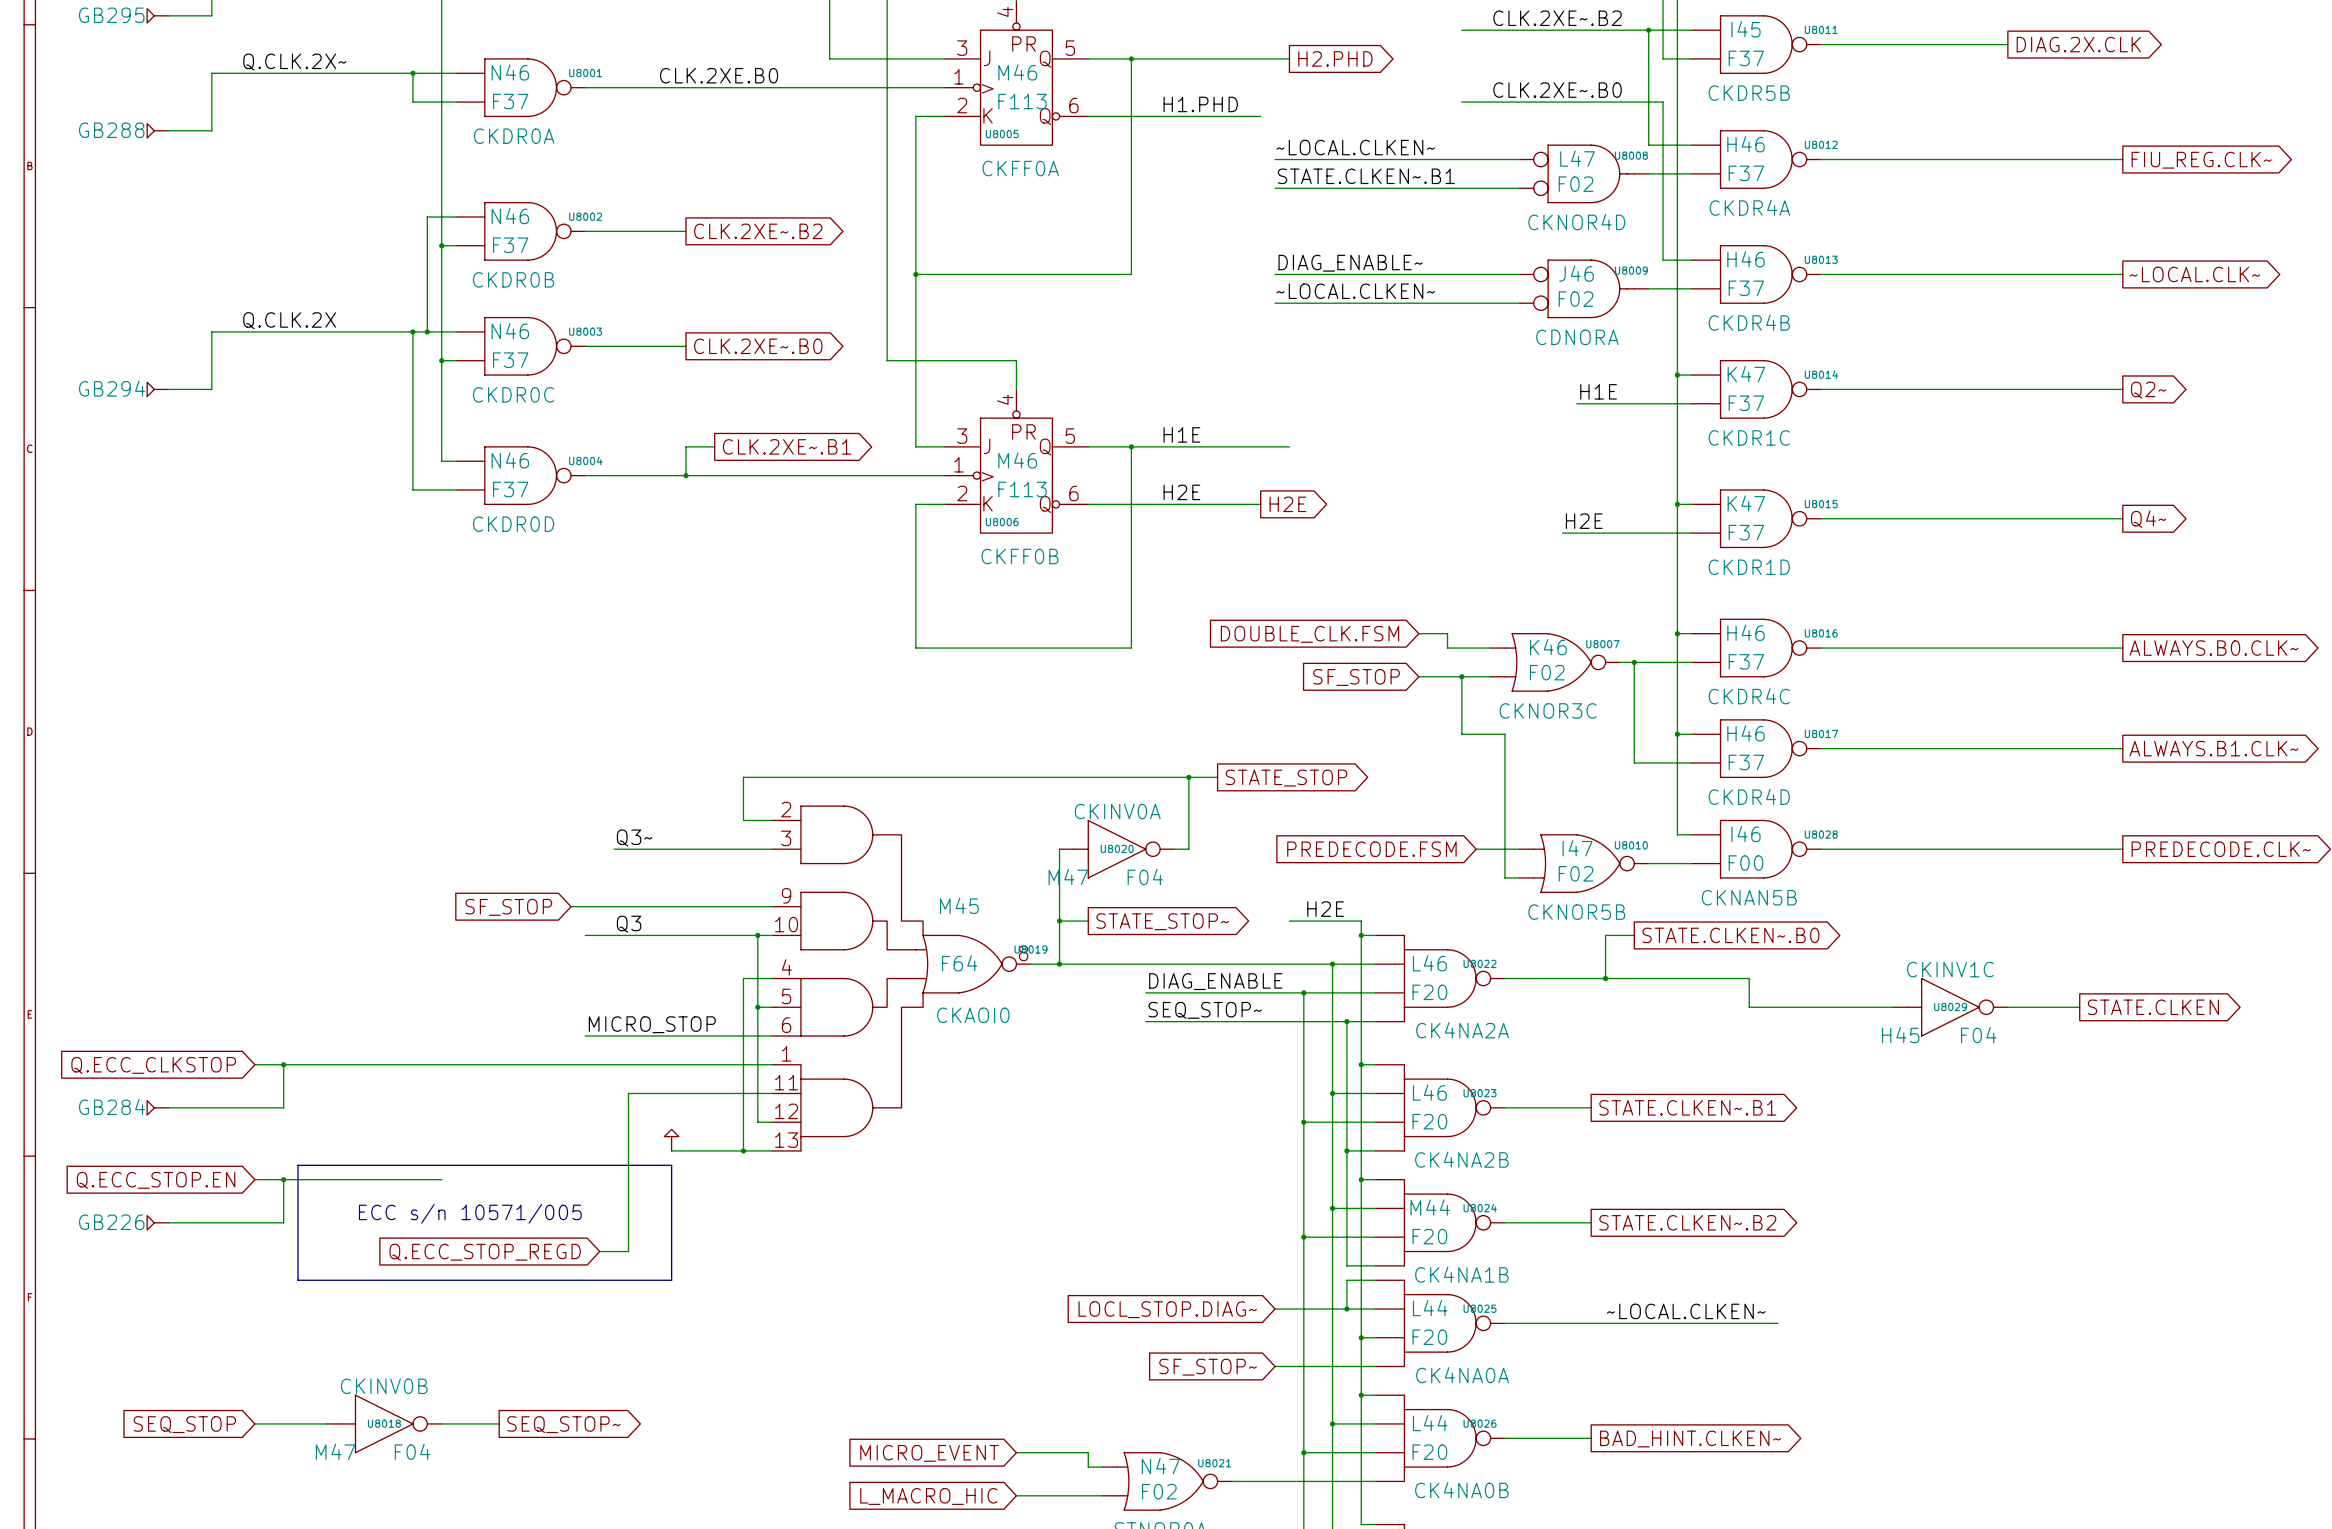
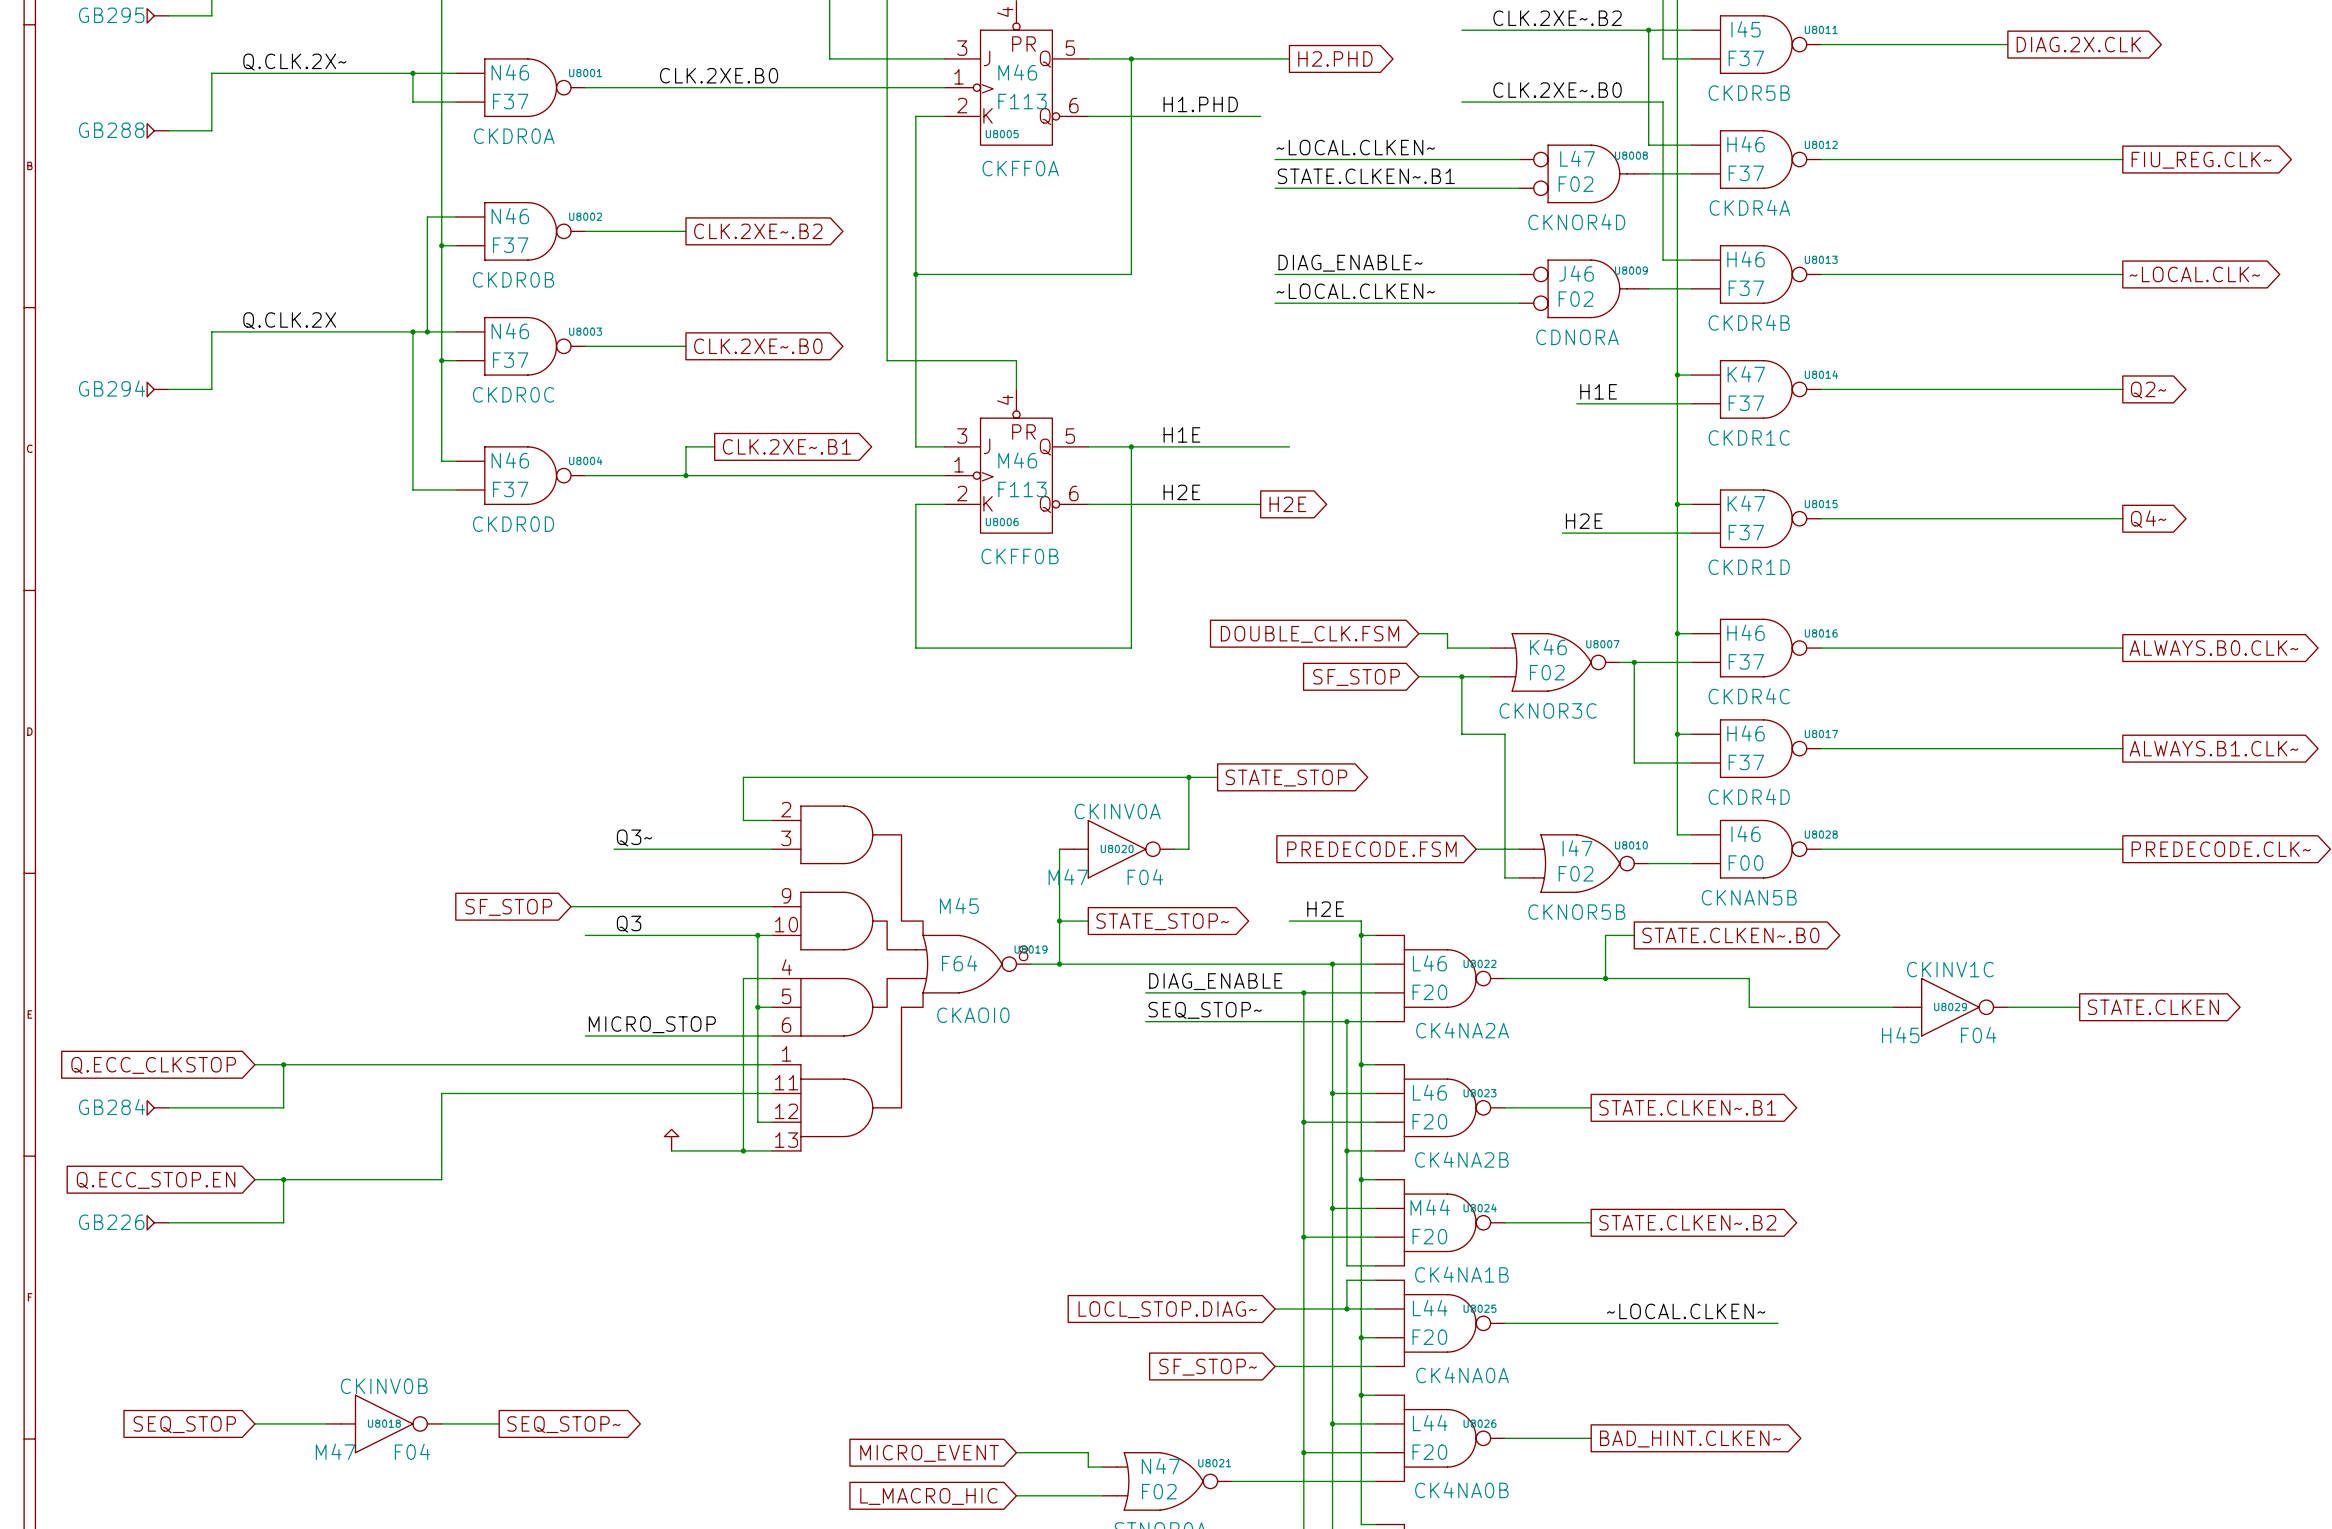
wire: (628, 1093) (628, 1251) (599, 1251) -> (628, 1093) (441, 1093) (441, 1179)
line: (298, 1165) (671, 1165) (671, 1280) (298, 1280) (298, 1165) -> none
text: ECC s/n 10571/005 (470, 1213) -> none
global label: Q.ECC_STOP_REGD (485, 1252) -> none

